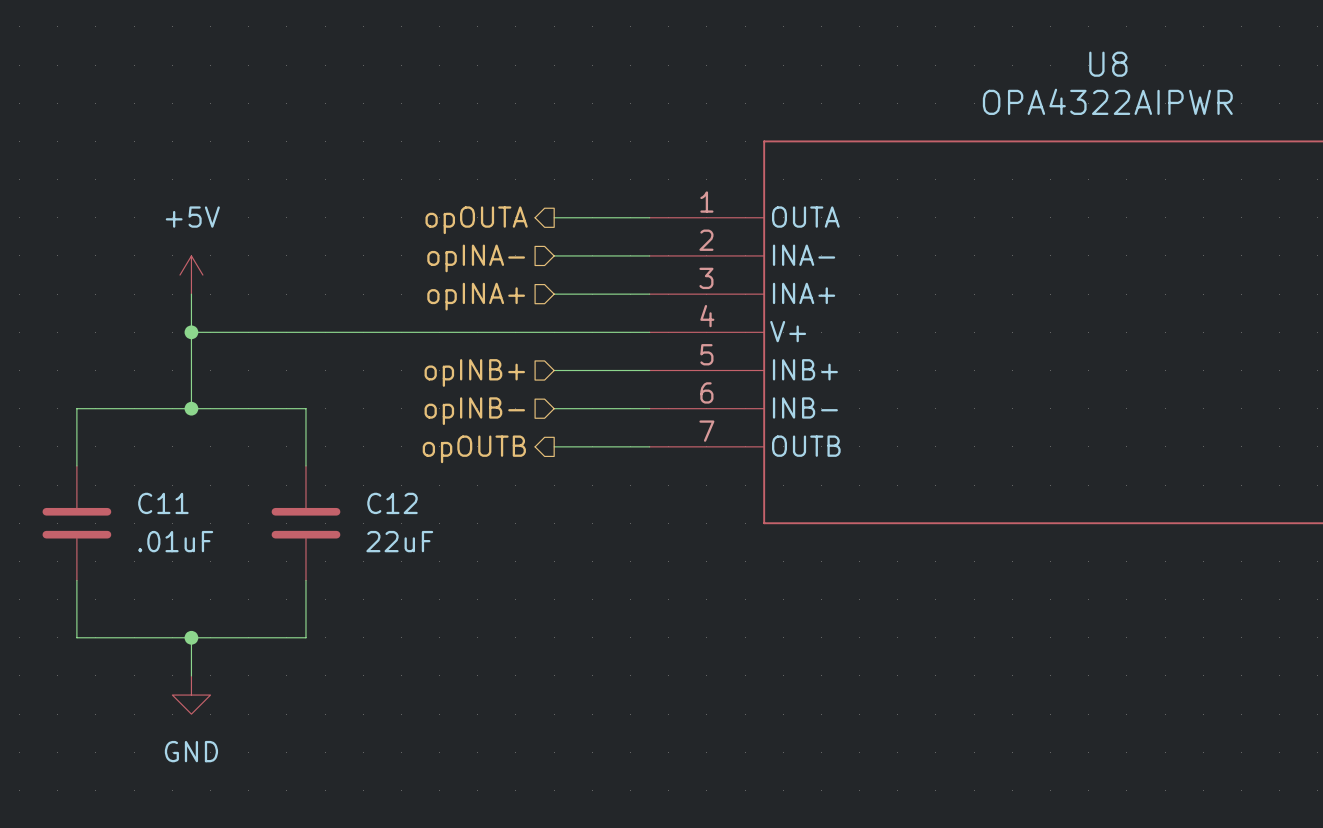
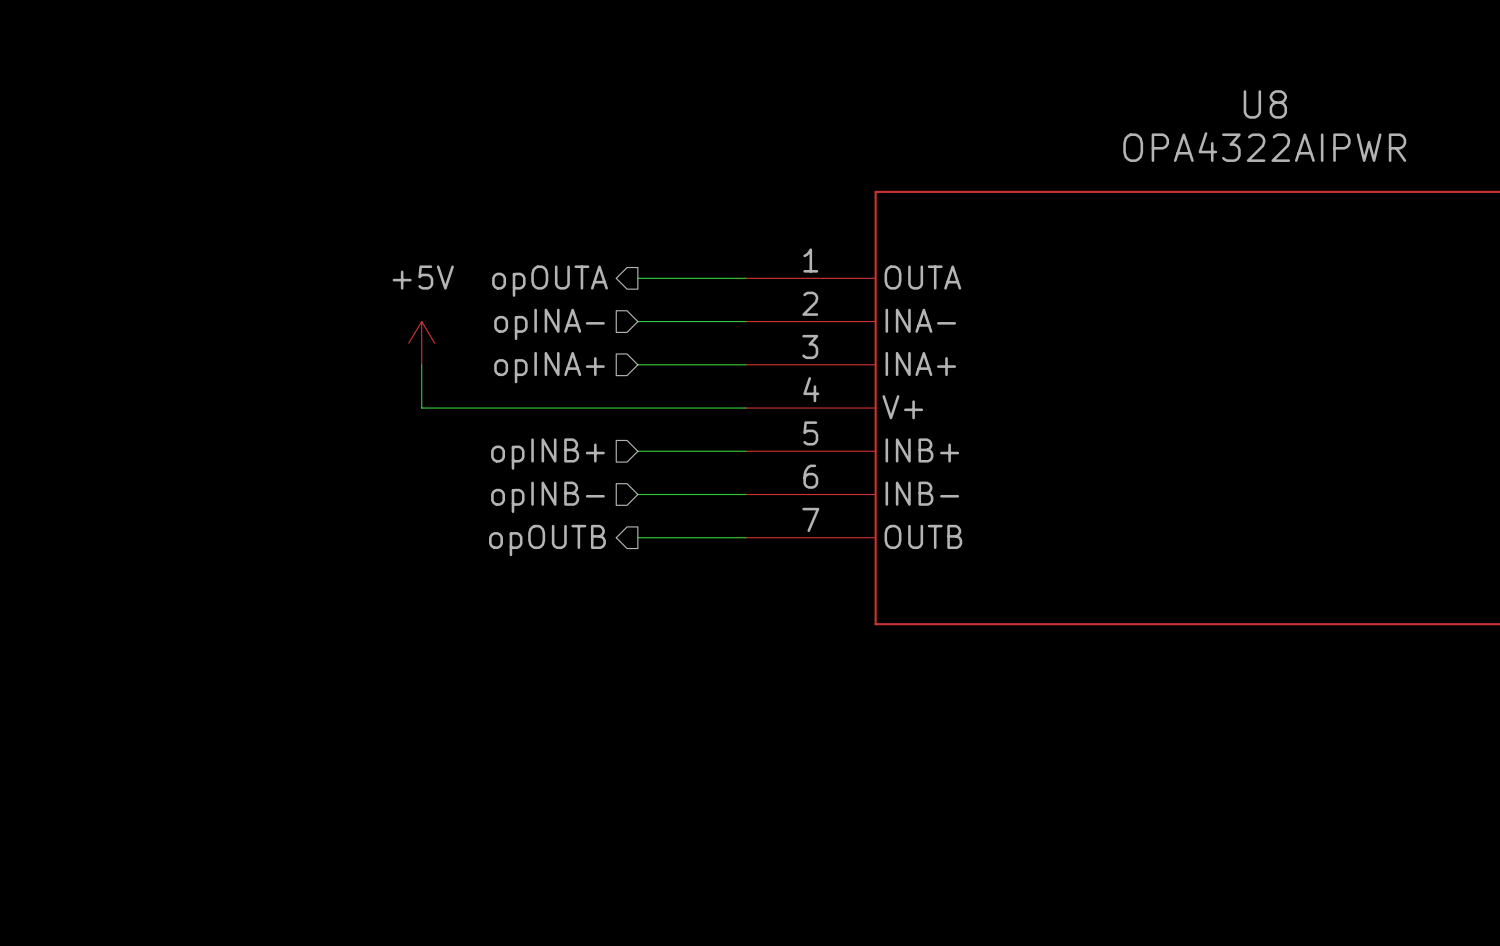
power symbol position: +5V (191, 275) -> +5V (421, 343)
wire: (191, 294) (191, 408) -> none
wire: (191, 332) (363, 332) -> (421, 364) (421, 408)
junction: (191, 332) -> none
junction: (191, 408) -> none
wire: (76, 465) (76, 408) (305, 408) (305, 465) -> none
C11: .01uF (76, 523) -> none
C12: 22uF (305, 523) -> none
wire: (76, 580) (76, 637) (305, 637) (305, 580) -> none
wire: (191, 637) (191, 675) -> none
junction: (191, 637) -> none
power symbol: GND (191, 695) -> none

